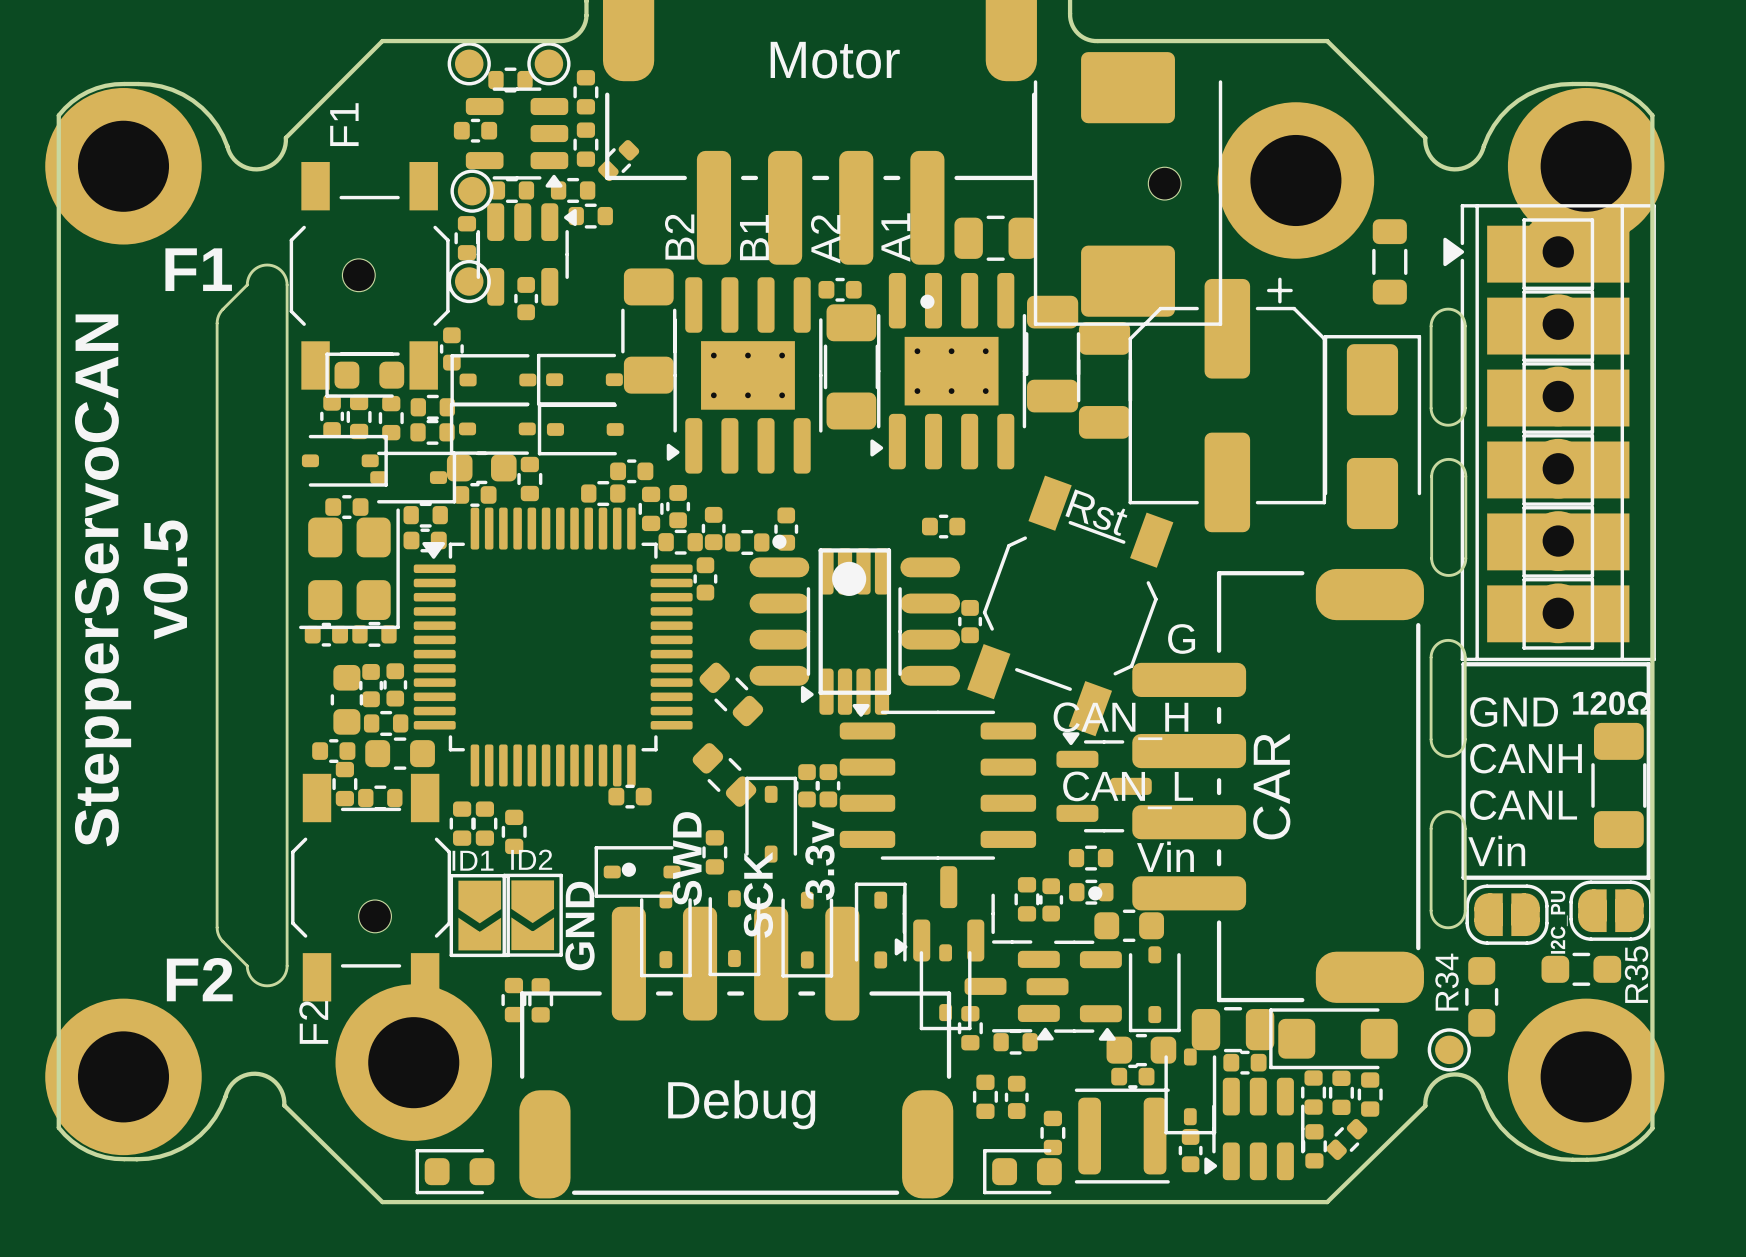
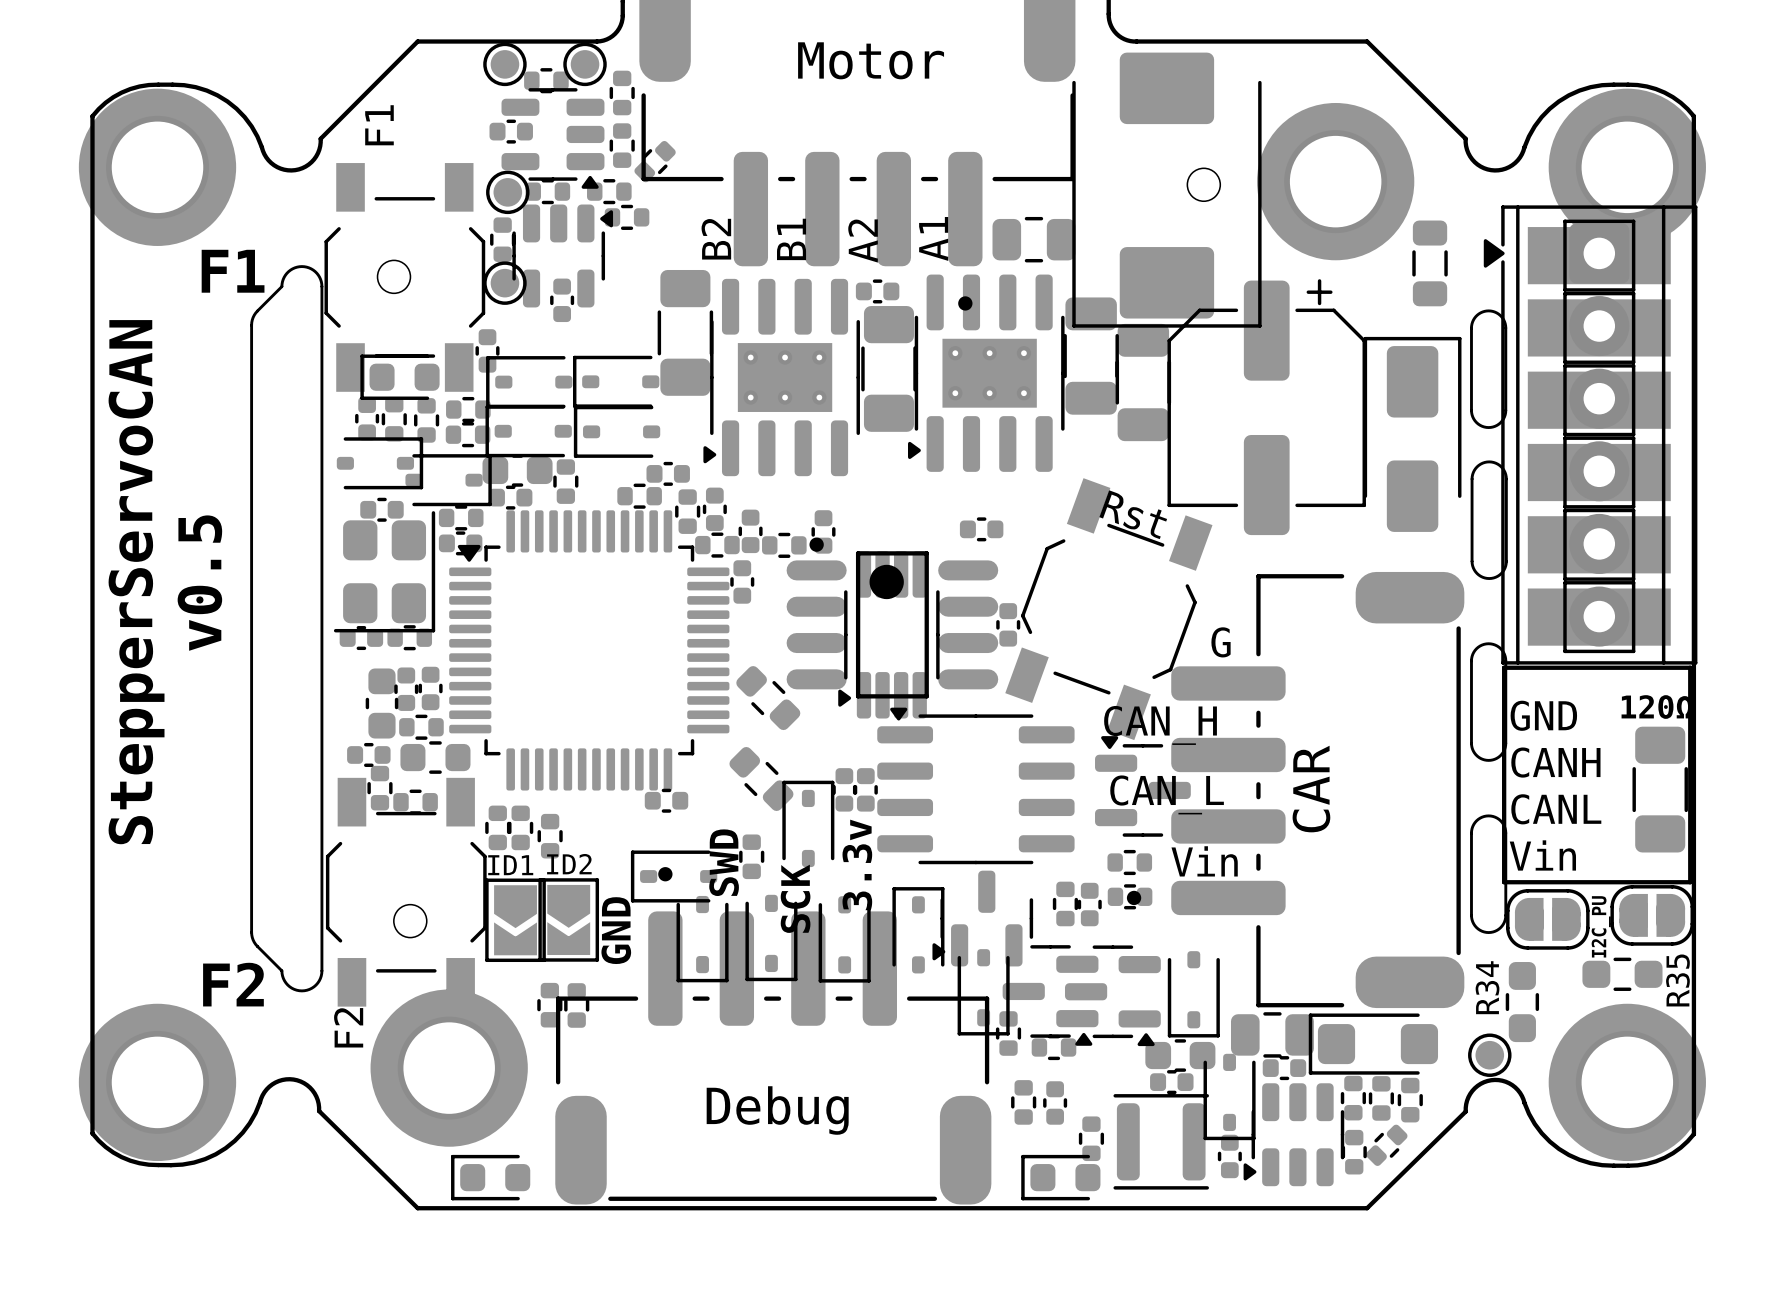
part: (1129, 925) -> none

